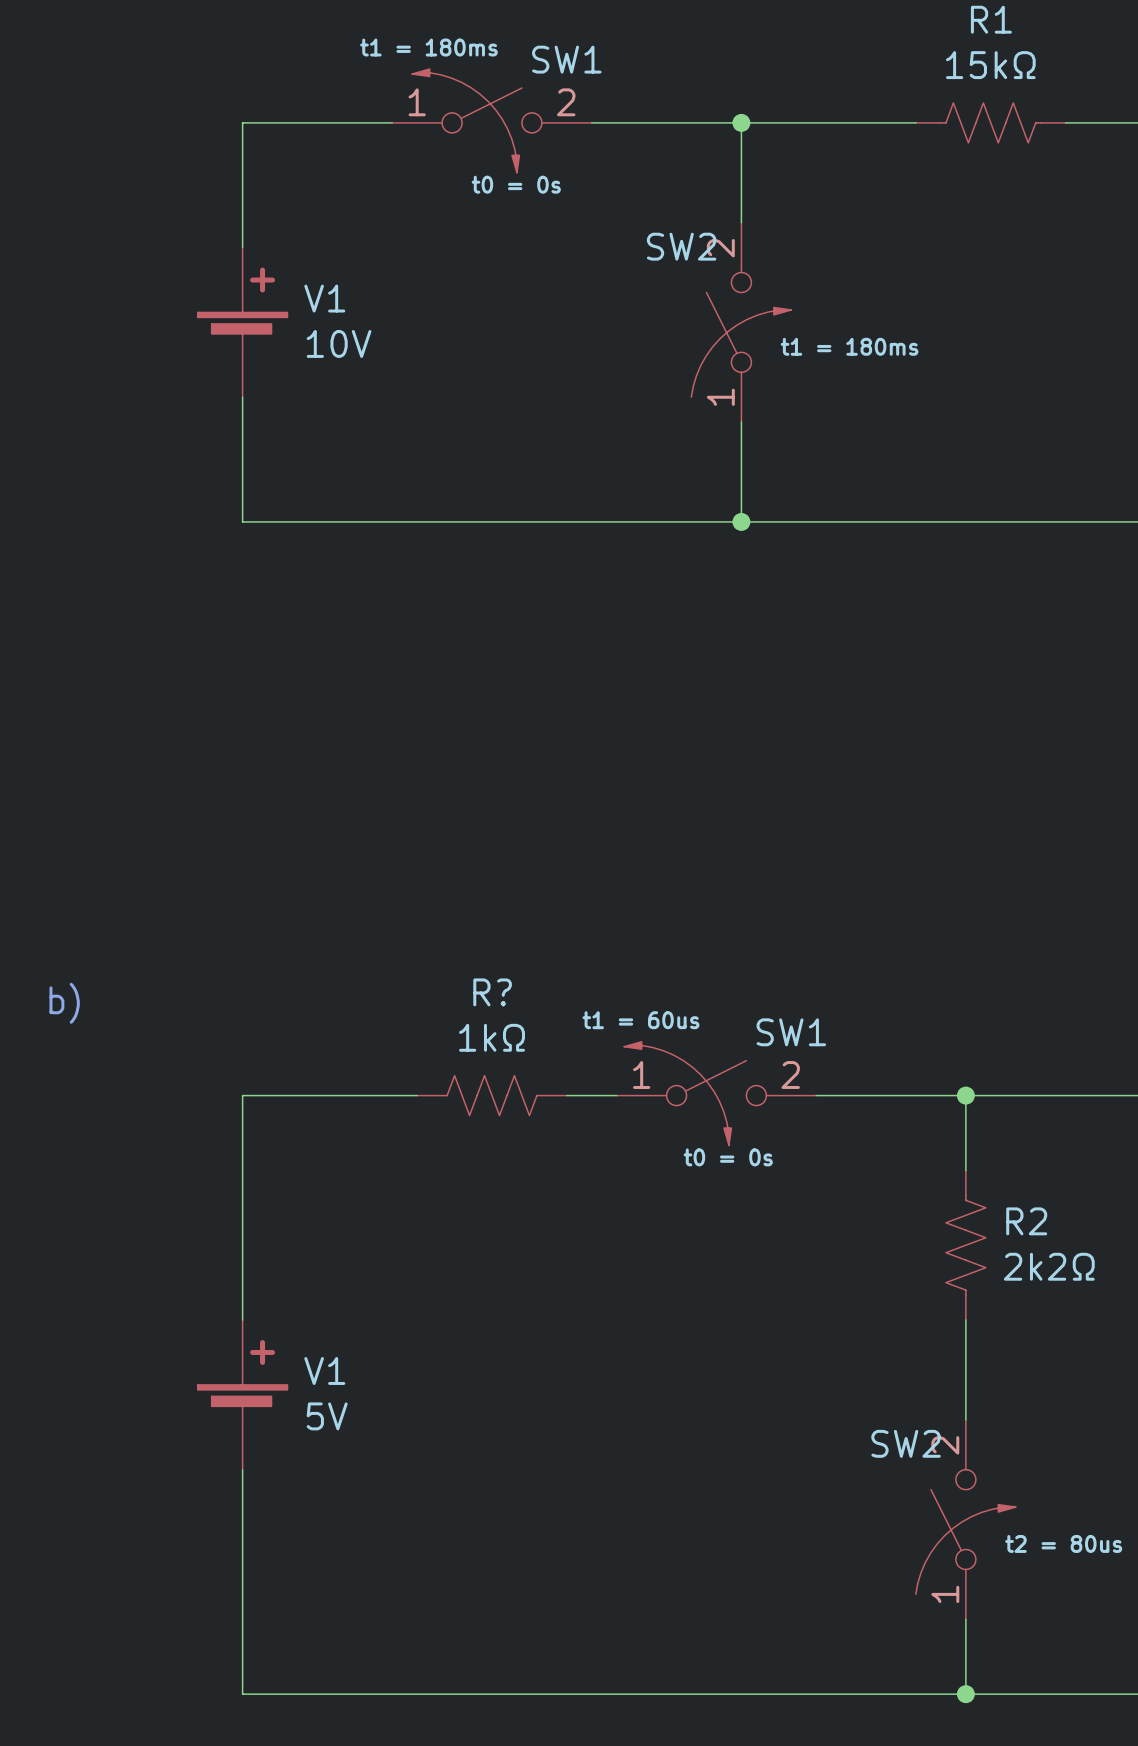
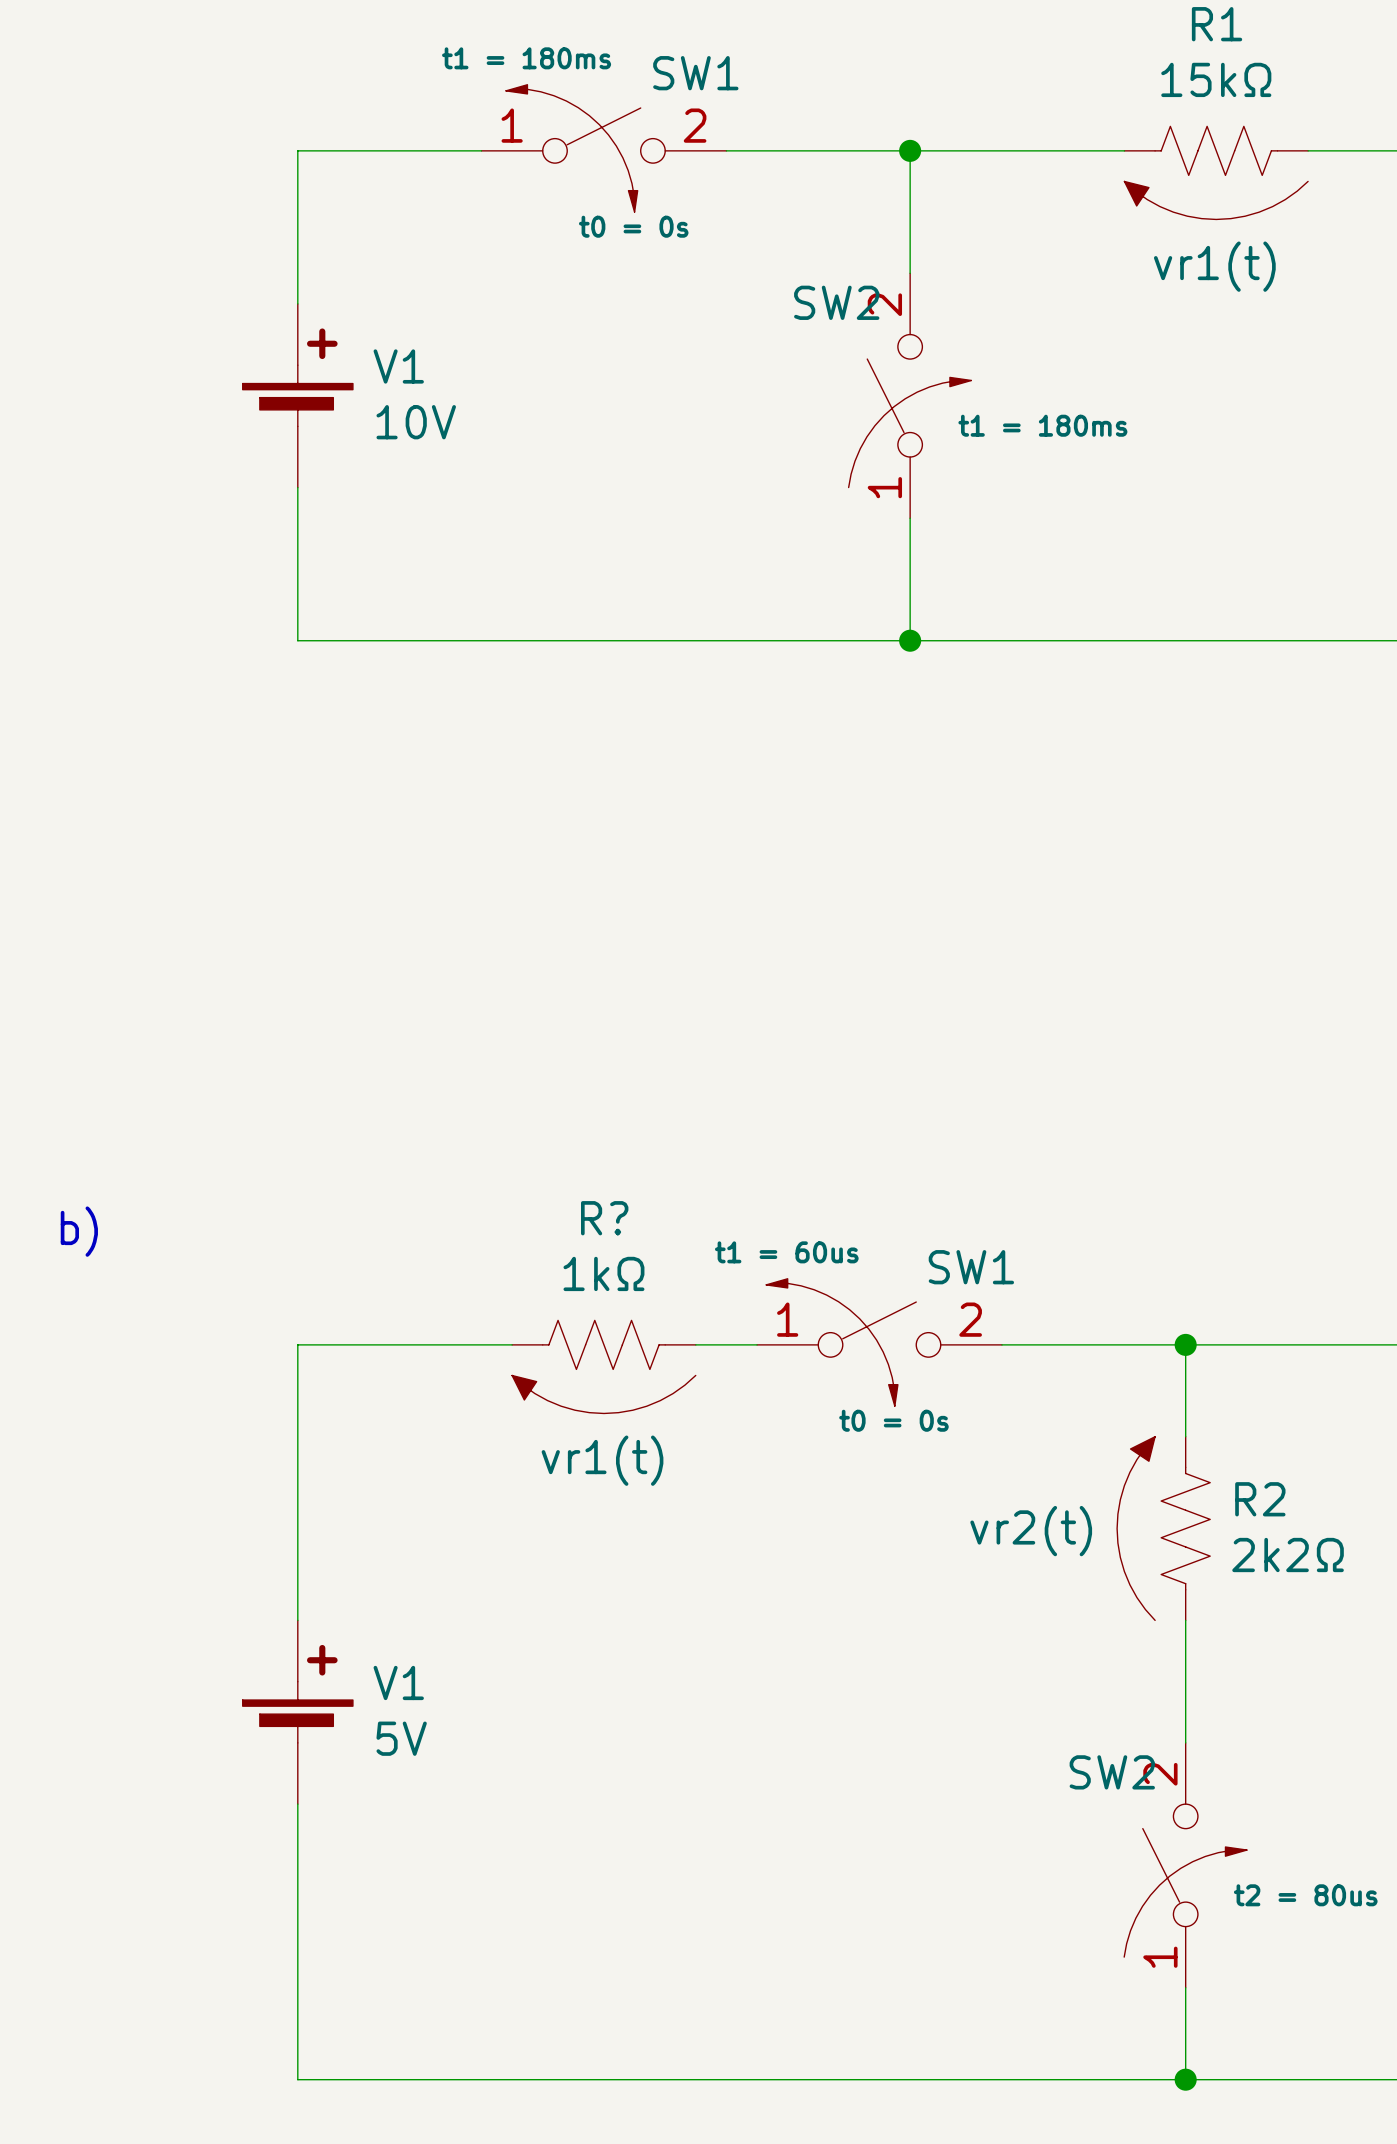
vr1(t): none -> (1216, 200)
vr1(t): none -> (603, 1394)
vr2(t): none -> (1136, 1528)

